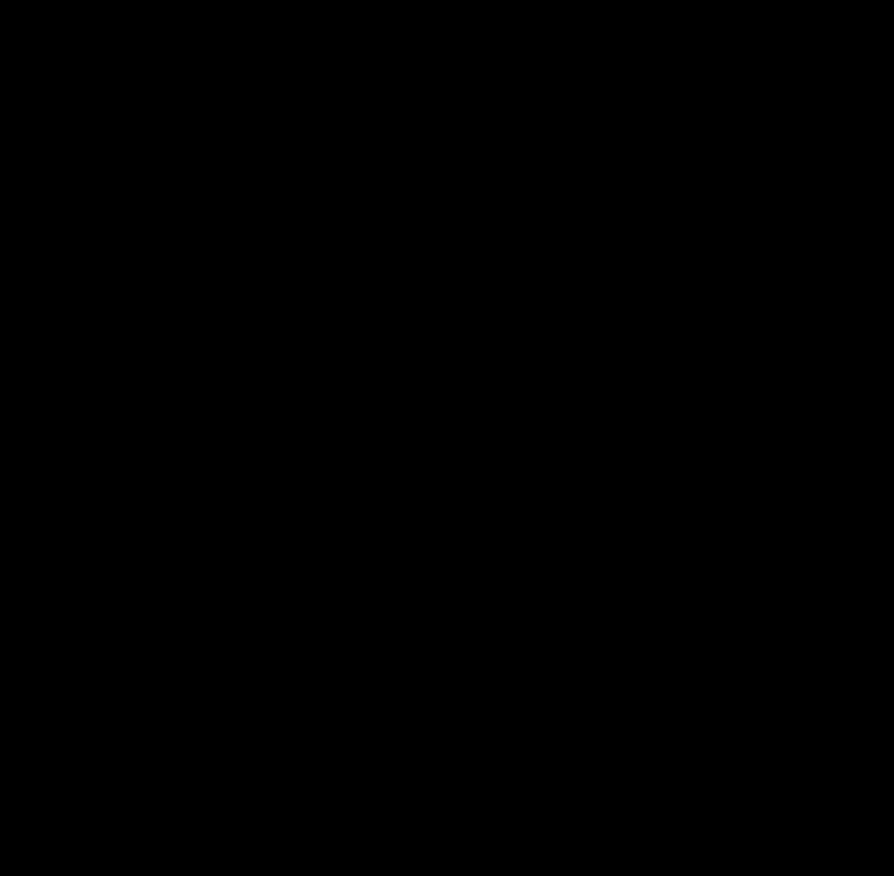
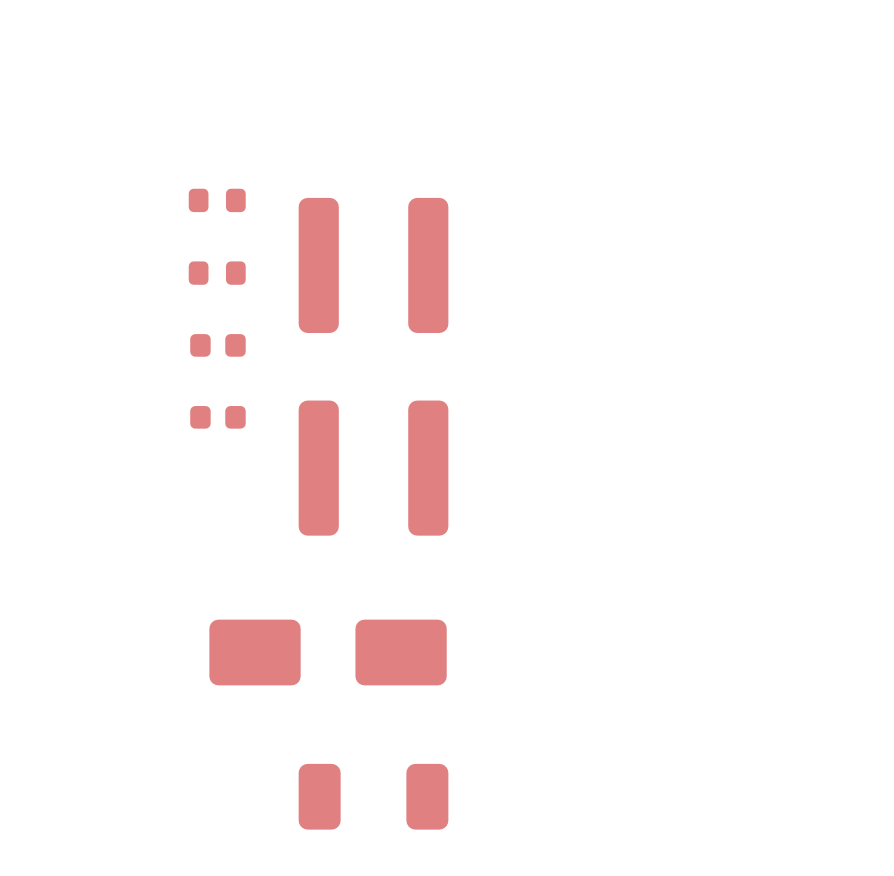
part: none -> (217, 200)
part: none -> (373, 265)
part: none -> (217, 273)
part: none -> (217, 345)
part: none -> (217, 417)
part: none -> (373, 468)
part: none -> (328, 652)
part: none -> (373, 796)

